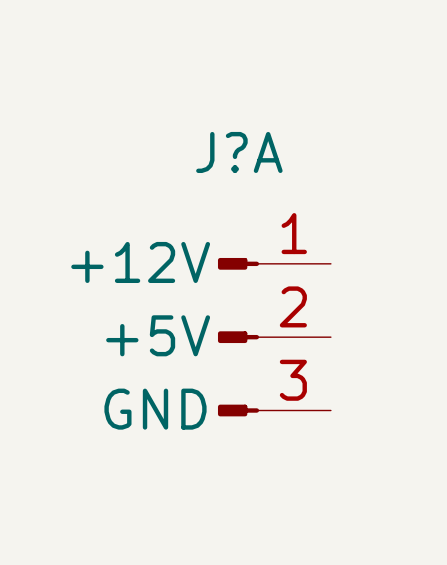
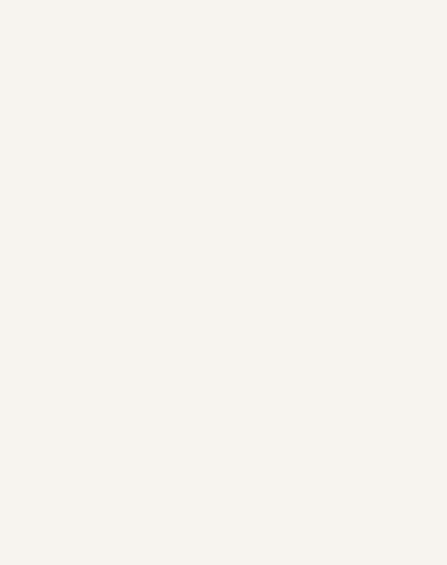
J?A: (274, 337) -> none

